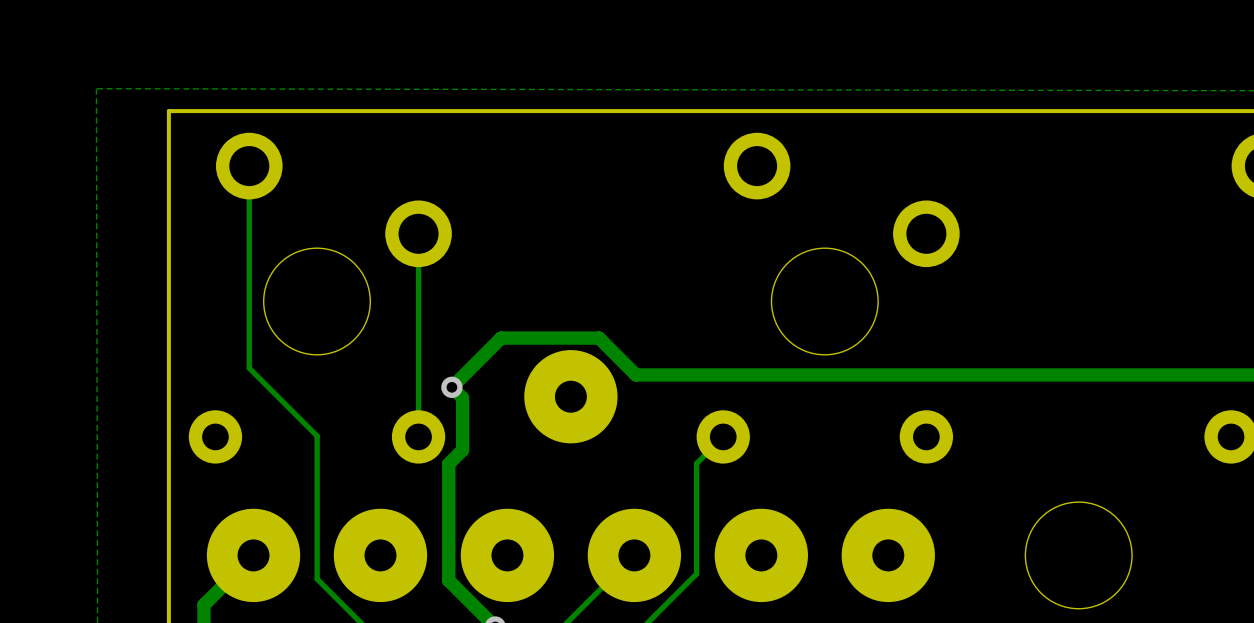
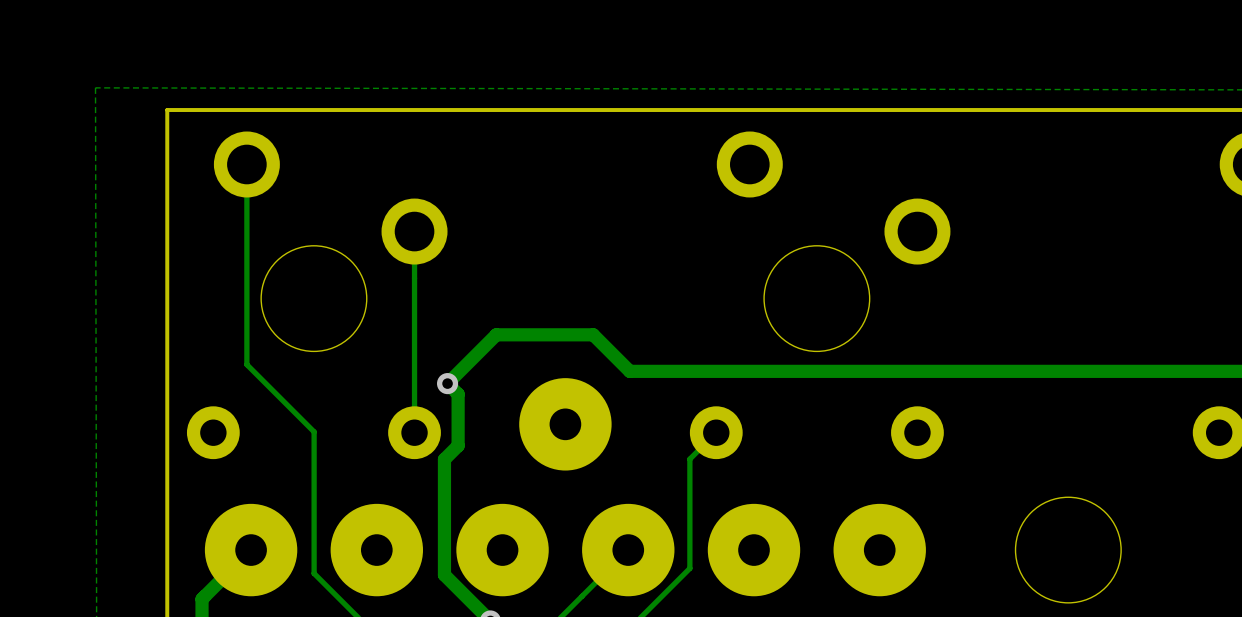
part position: (570, 396) -> (565, 424)

